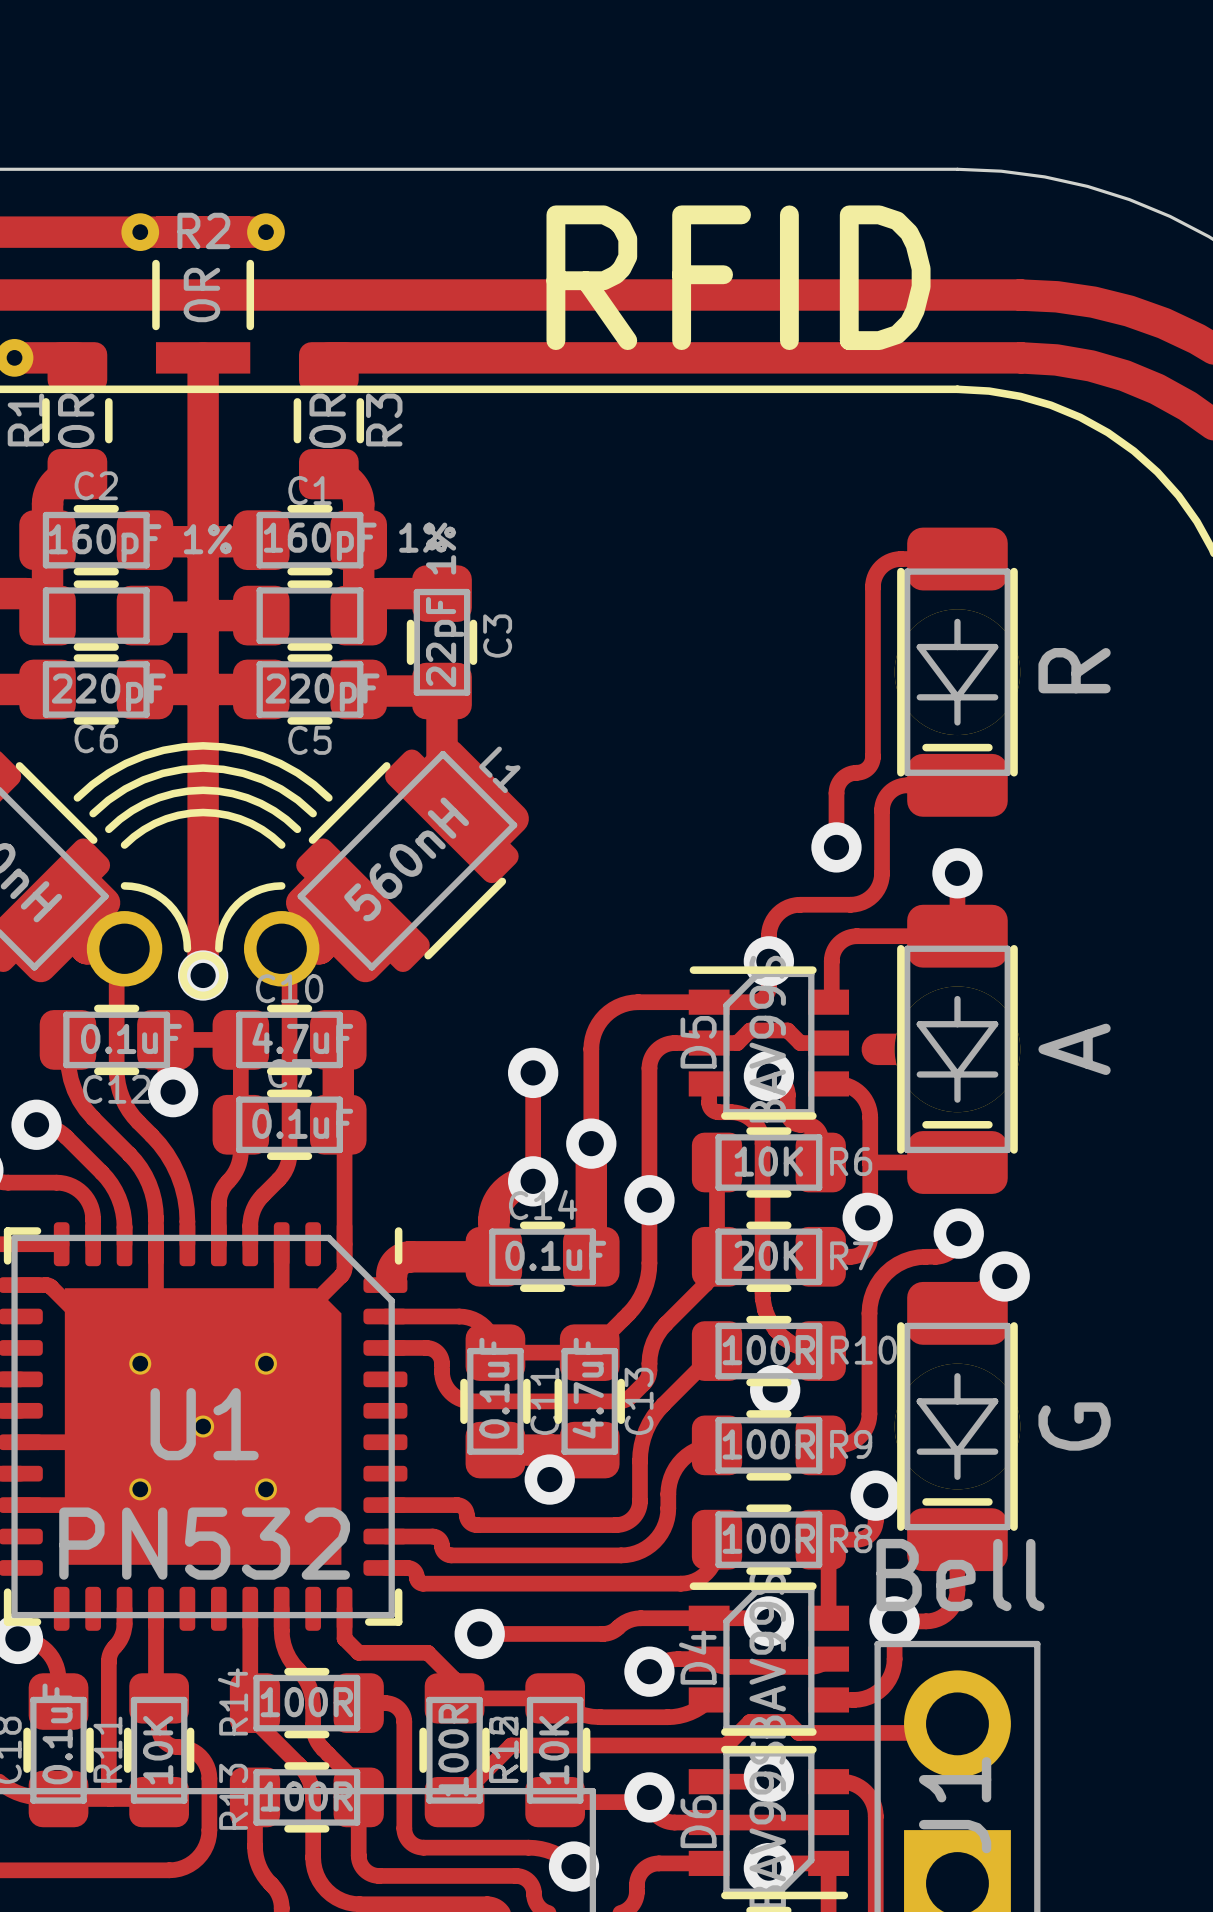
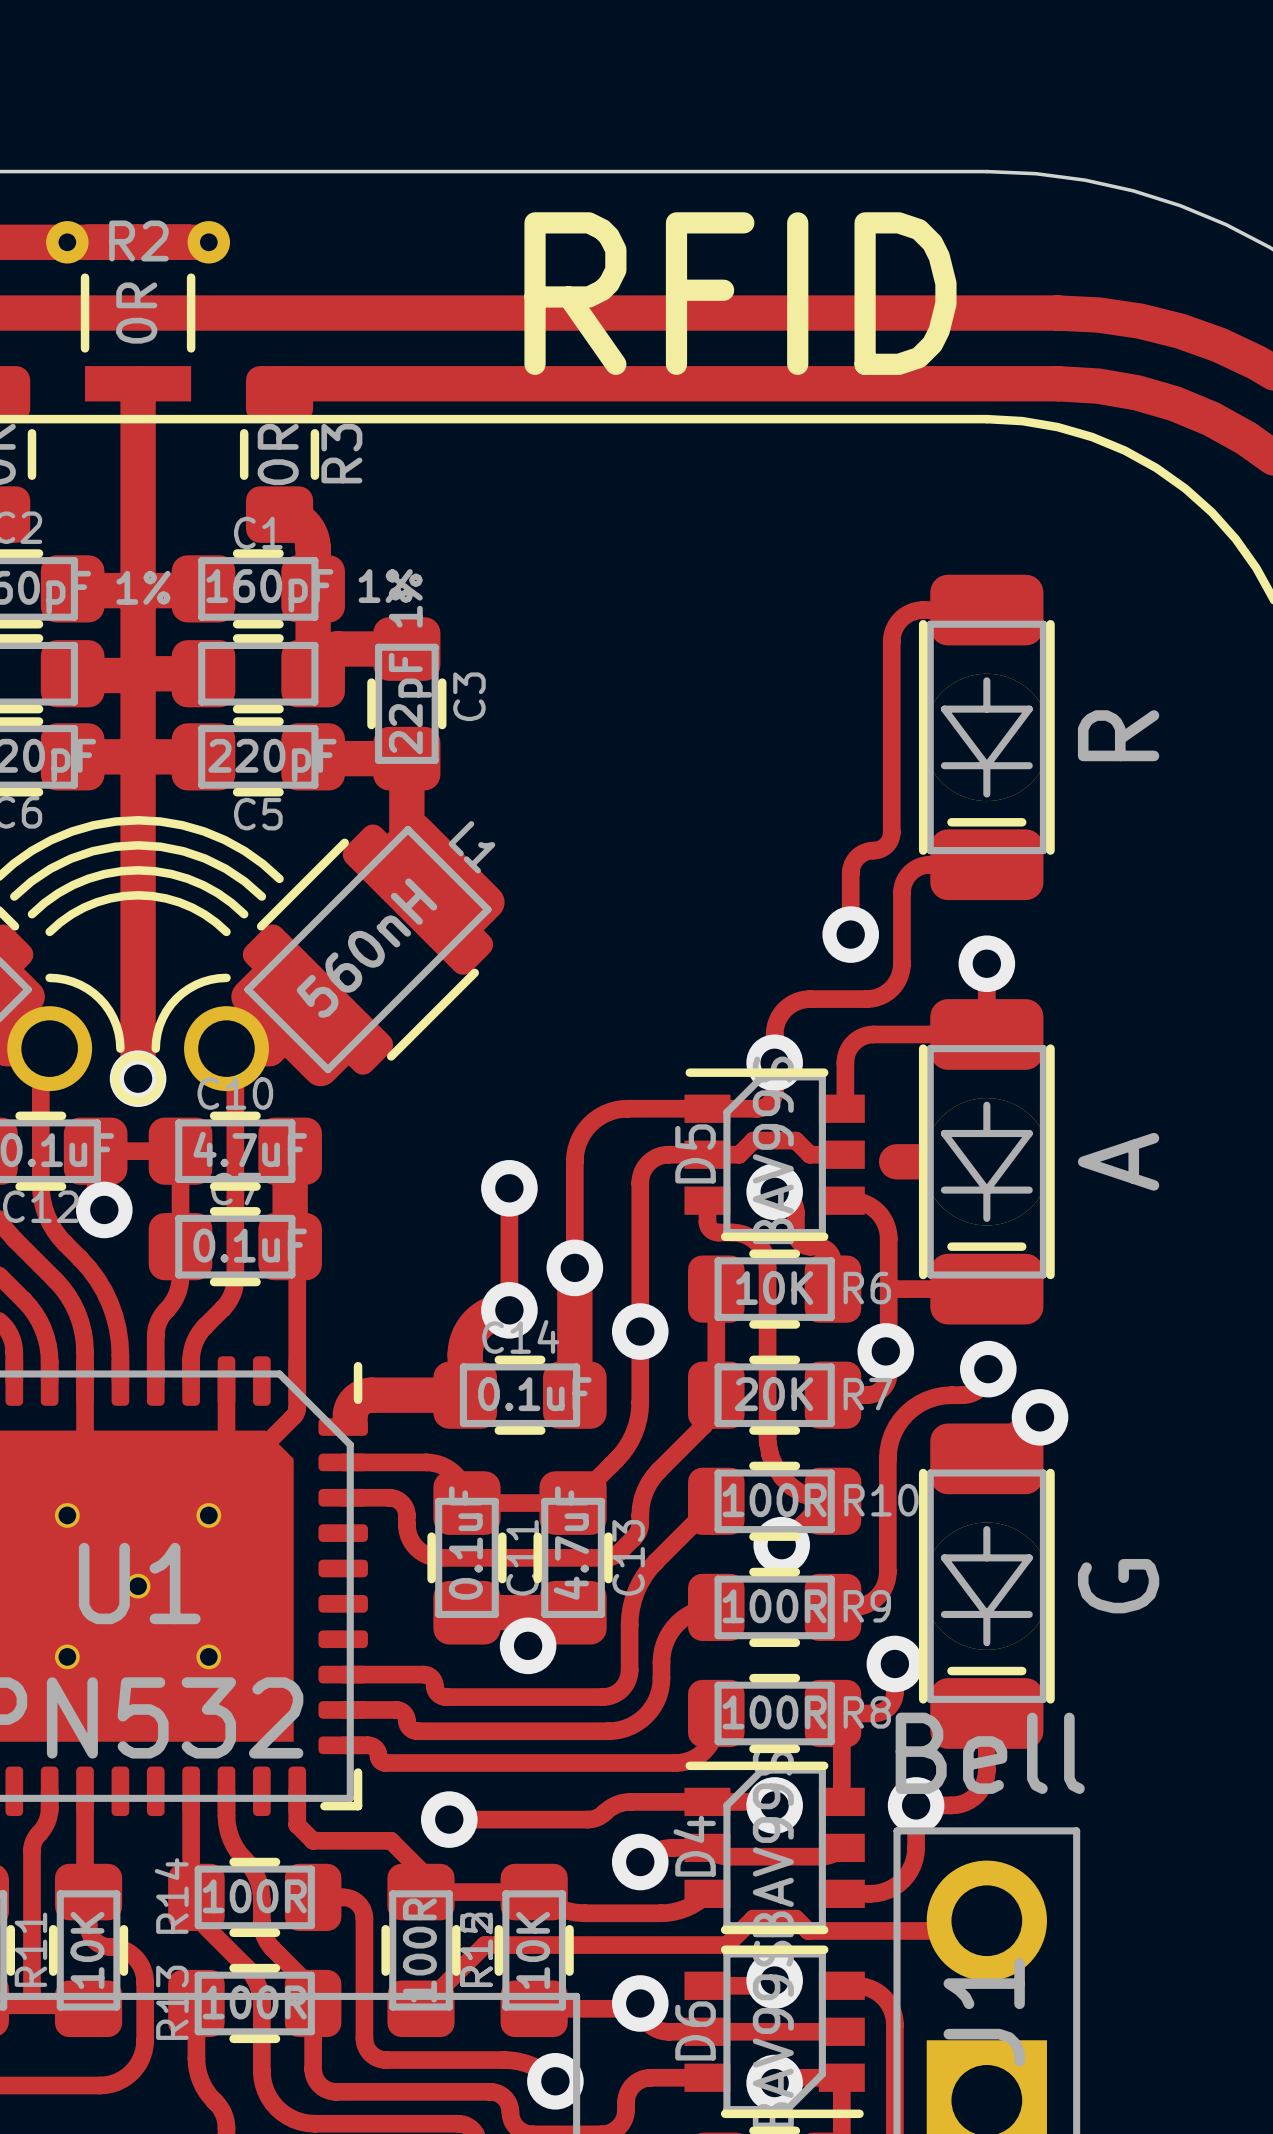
part footprint: [894, 527, 1021, 817] -> [918, 574, 1055, 901]
part footprint: [894, 904, 1021, 1194] -> [918, 999, 1055, 1325]
part footprint: [894, 1281, 1021, 1572] -> [918, 1423, 1055, 1749]

